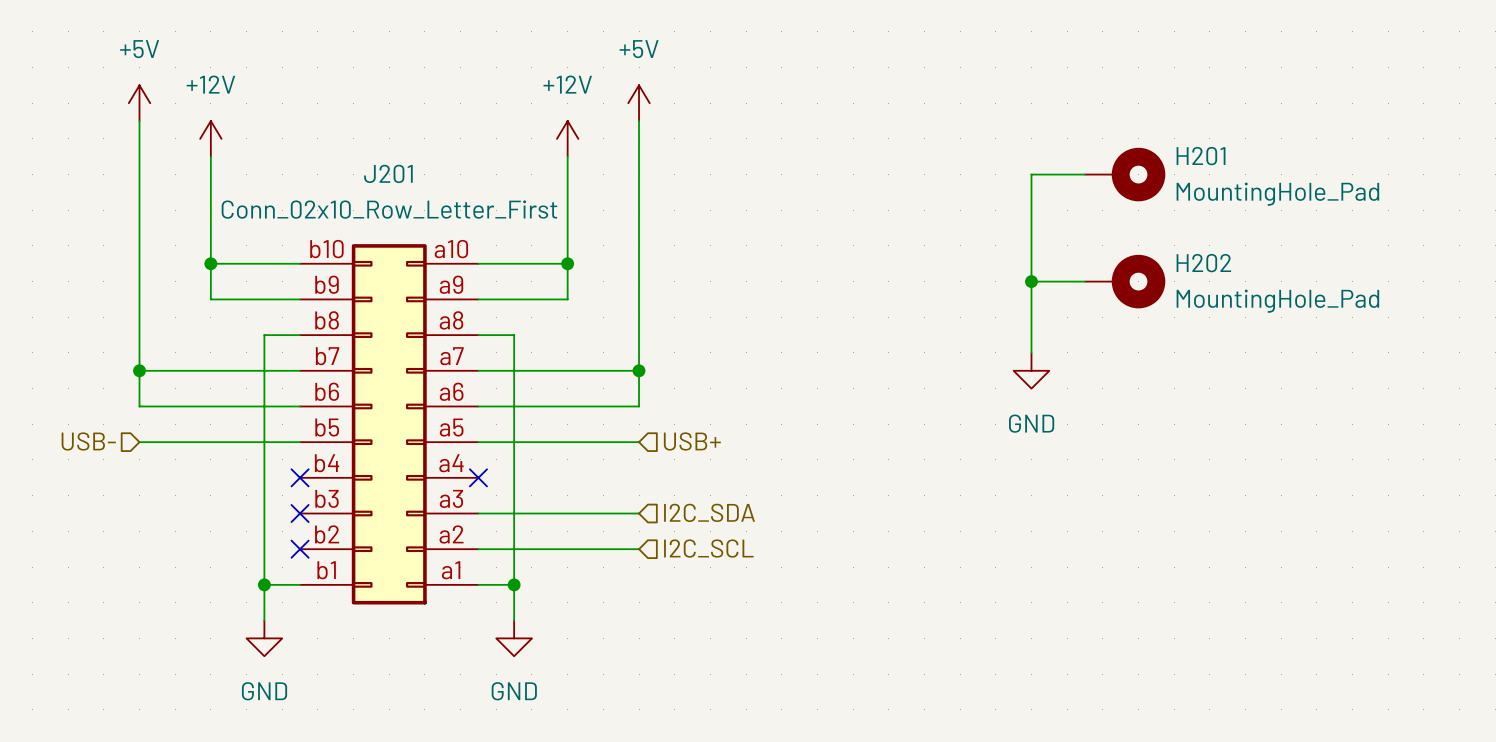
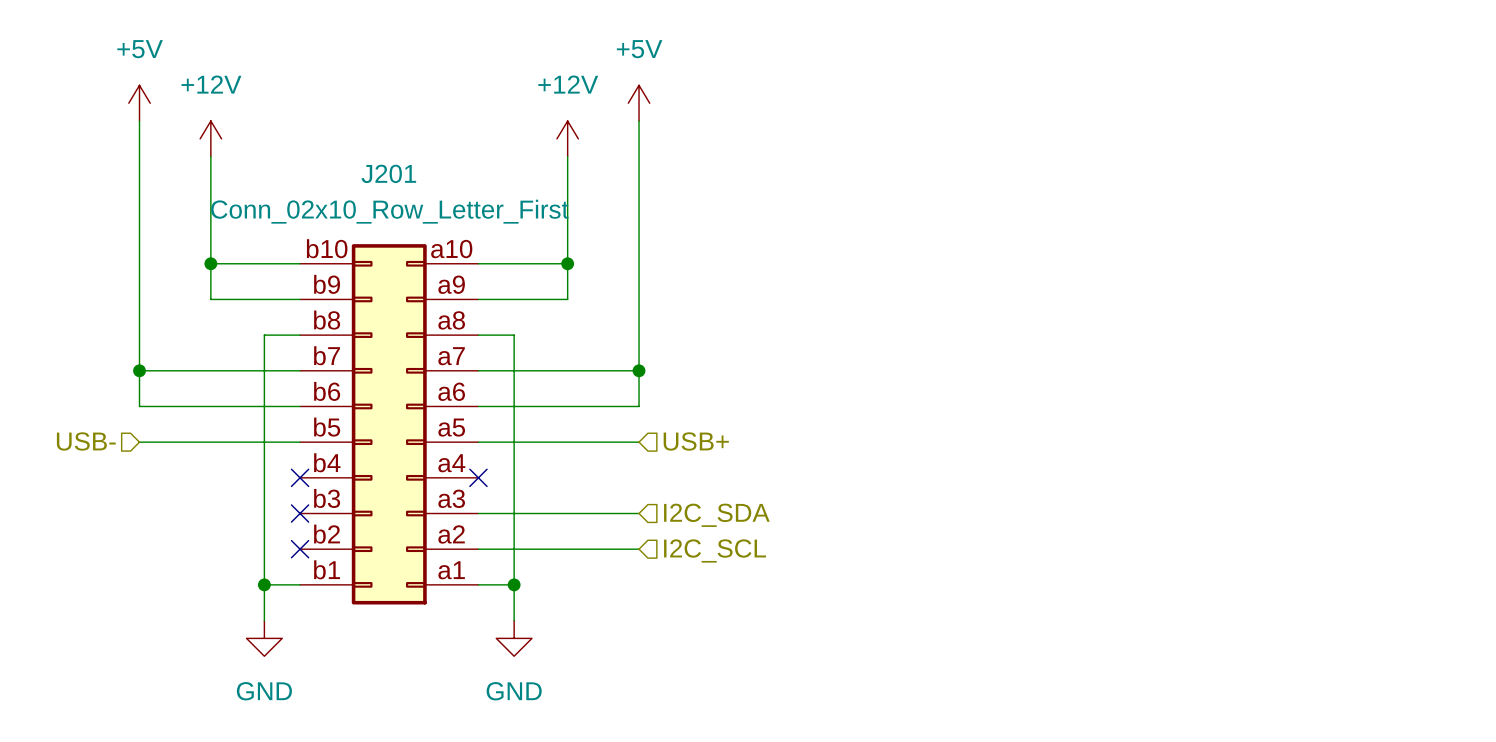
wire: (1085, 174) (1031, 174) (1031, 352) -> none
H201: MountingHole_Pad (1125, 174) -> none
wire: (1031, 281) (1085, 281) -> none
junction: (1031, 281) -> none
H202: MountingHole_Pad (1125, 281) -> none
power symbol: GND (1031, 370) -> none

